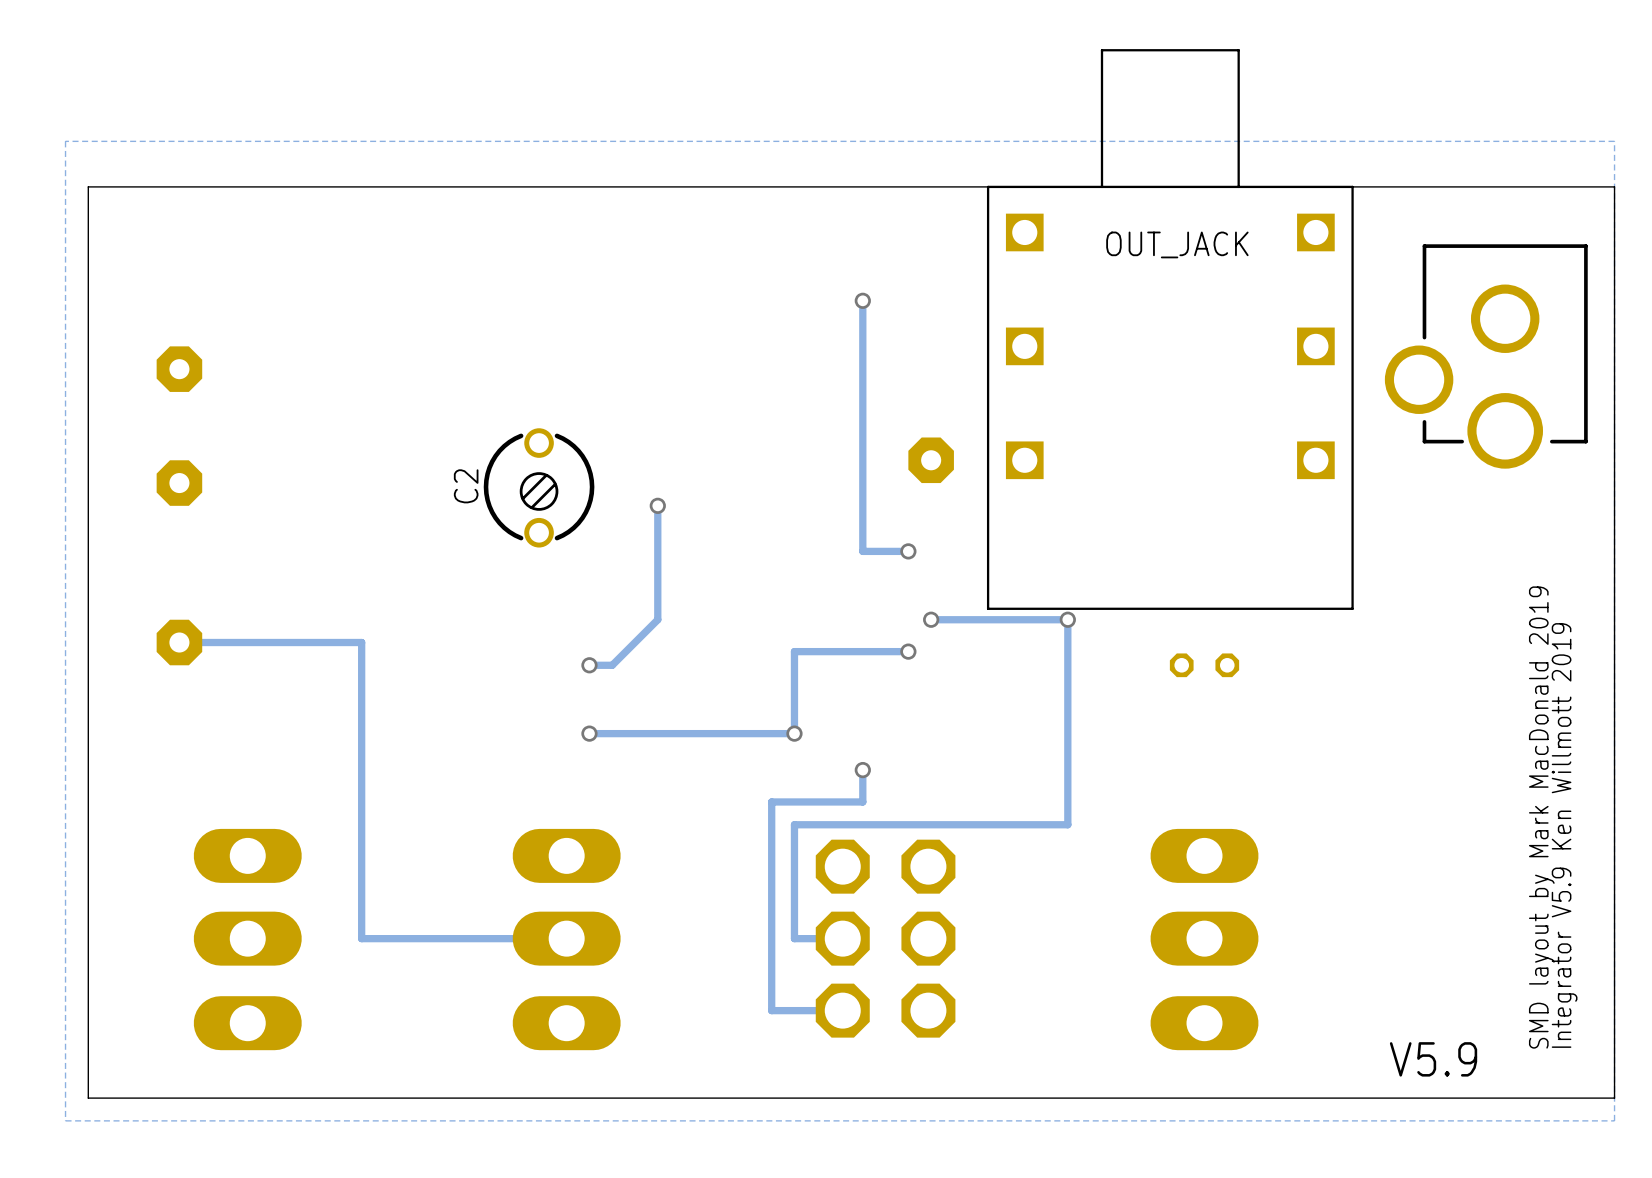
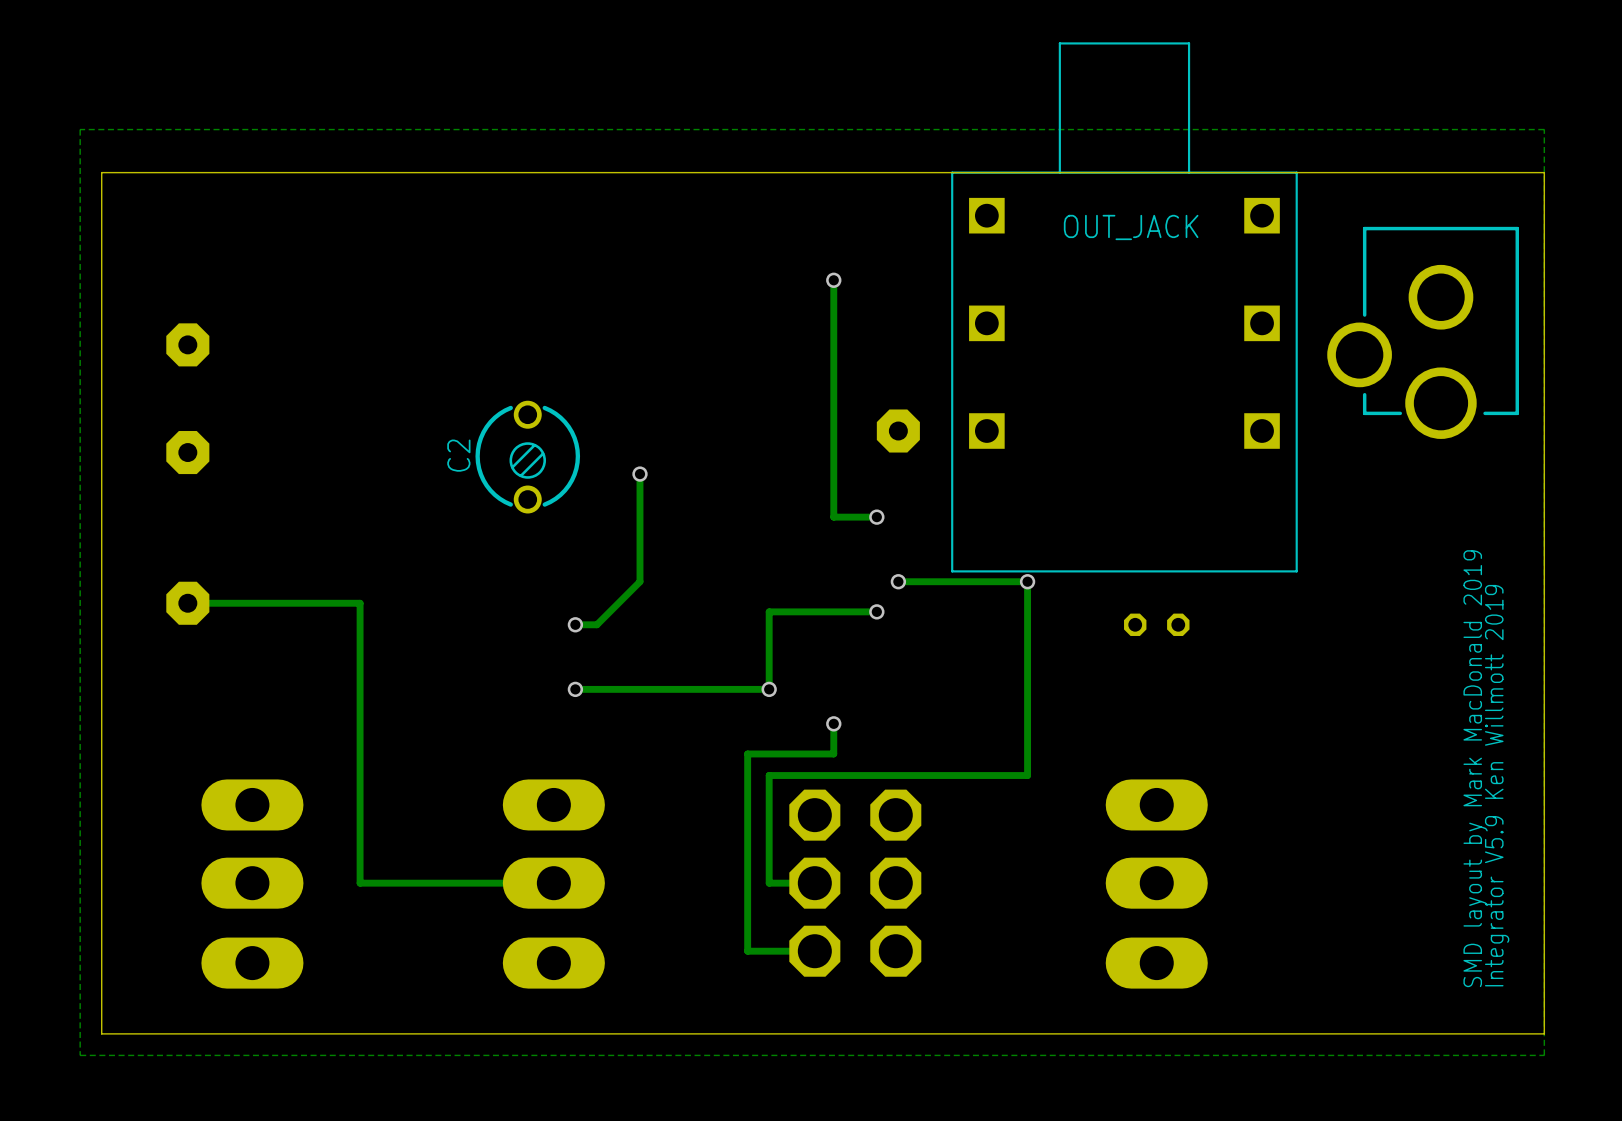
text: V5.9 (1433, 1059) -> none

